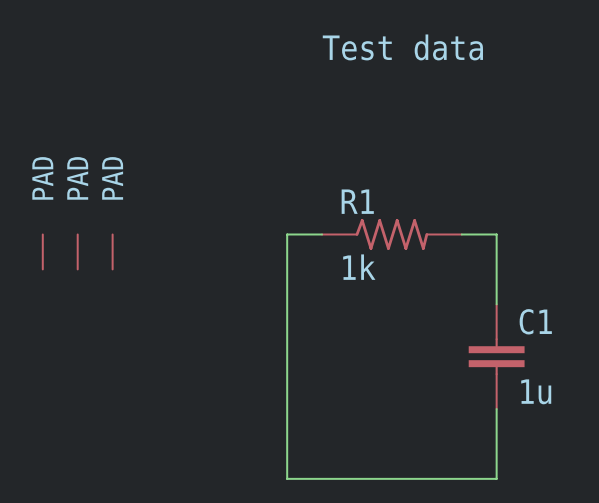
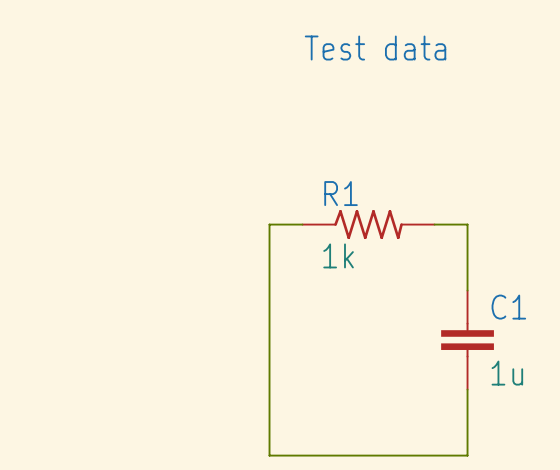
part: (42, 251) -> none
part: (77, 251) -> none
part: (112, 251) -> none

